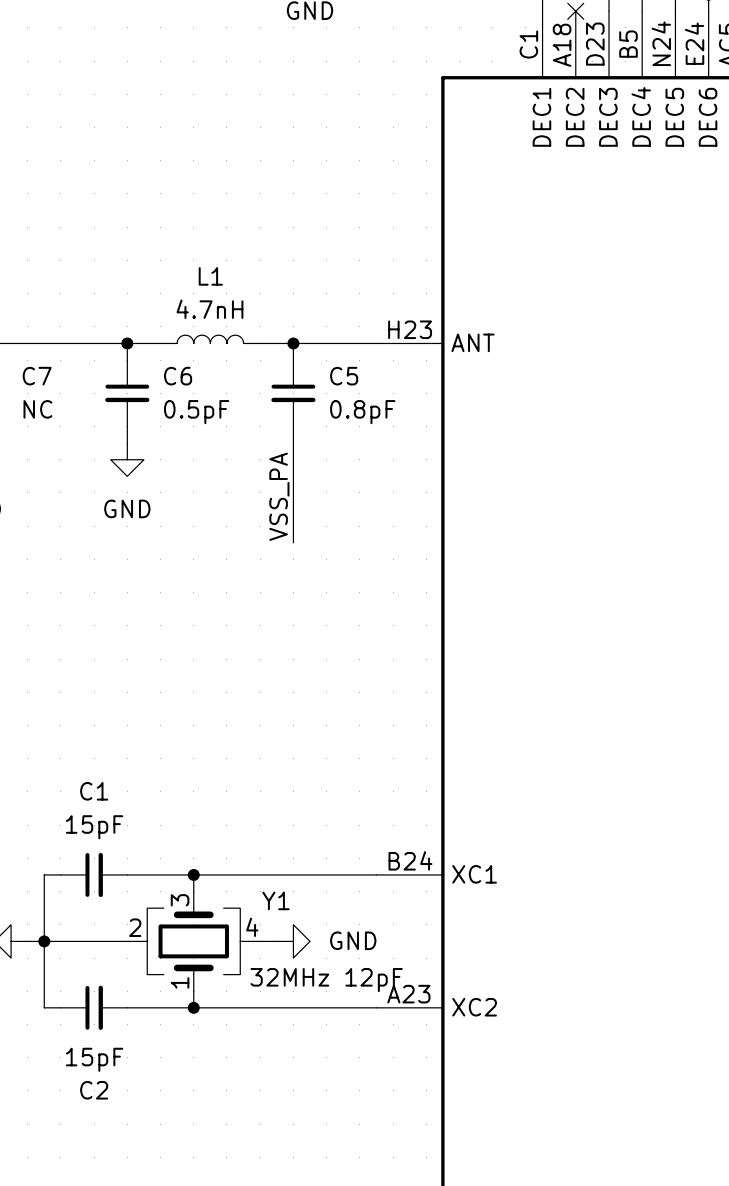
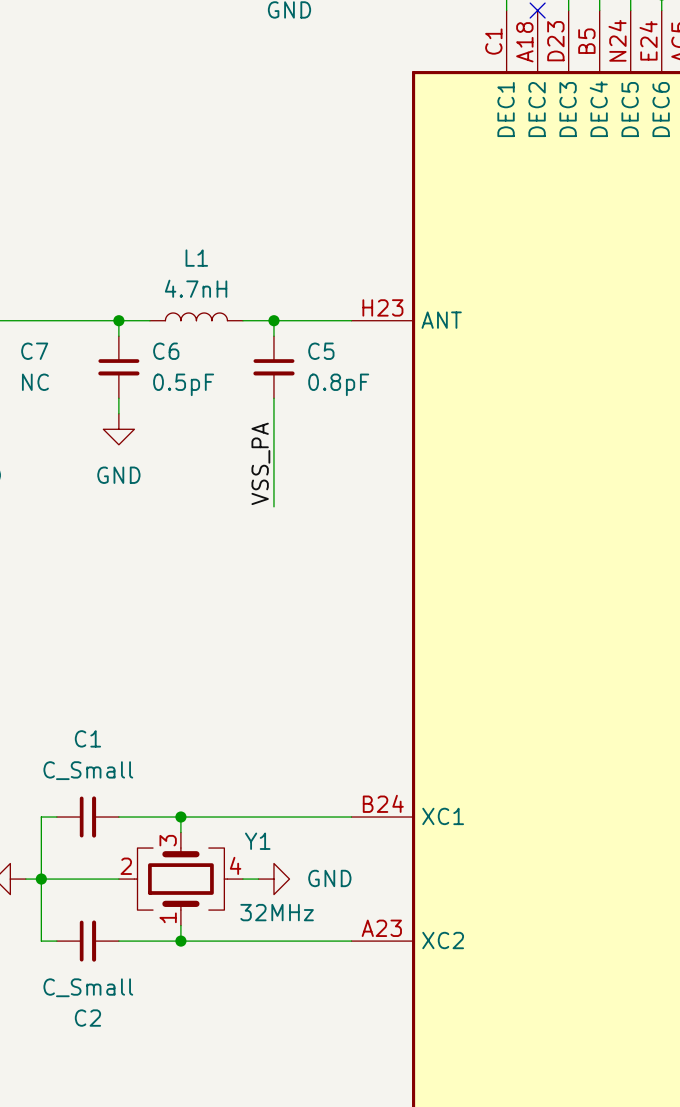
C1 value: 15pF (94, 827) -> C_Small (88, 770)
Y1 value: 32MHz 12pF (326, 980) -> 32MHz (277, 912)
C2 value: 15pF (94, 1059) -> C_Small (88, 987)

